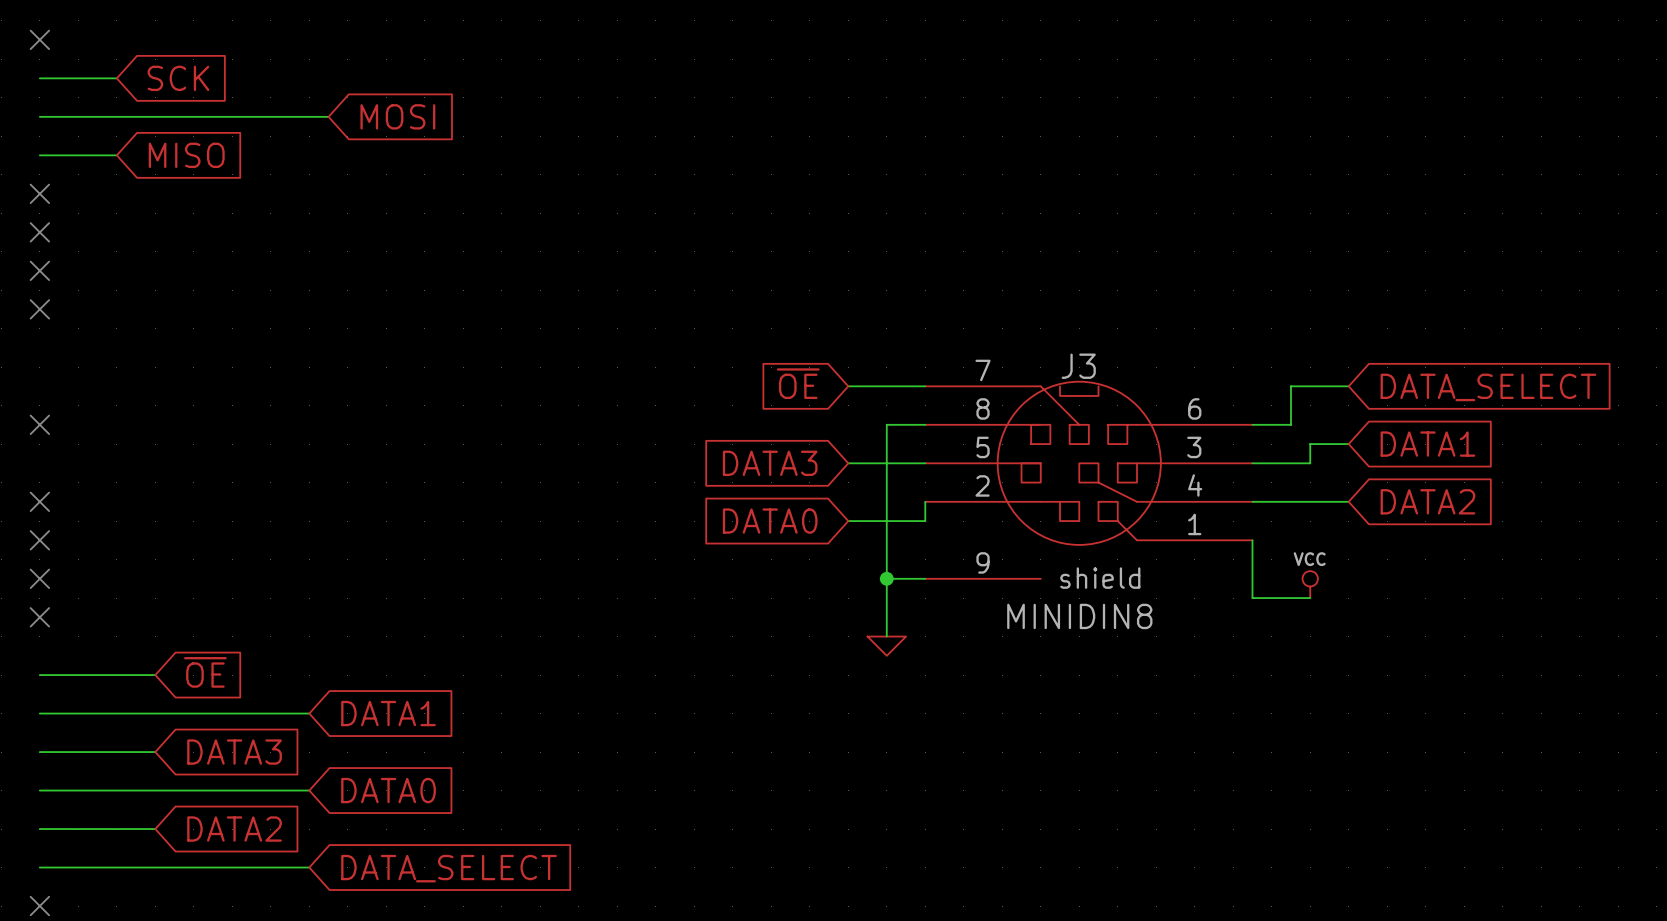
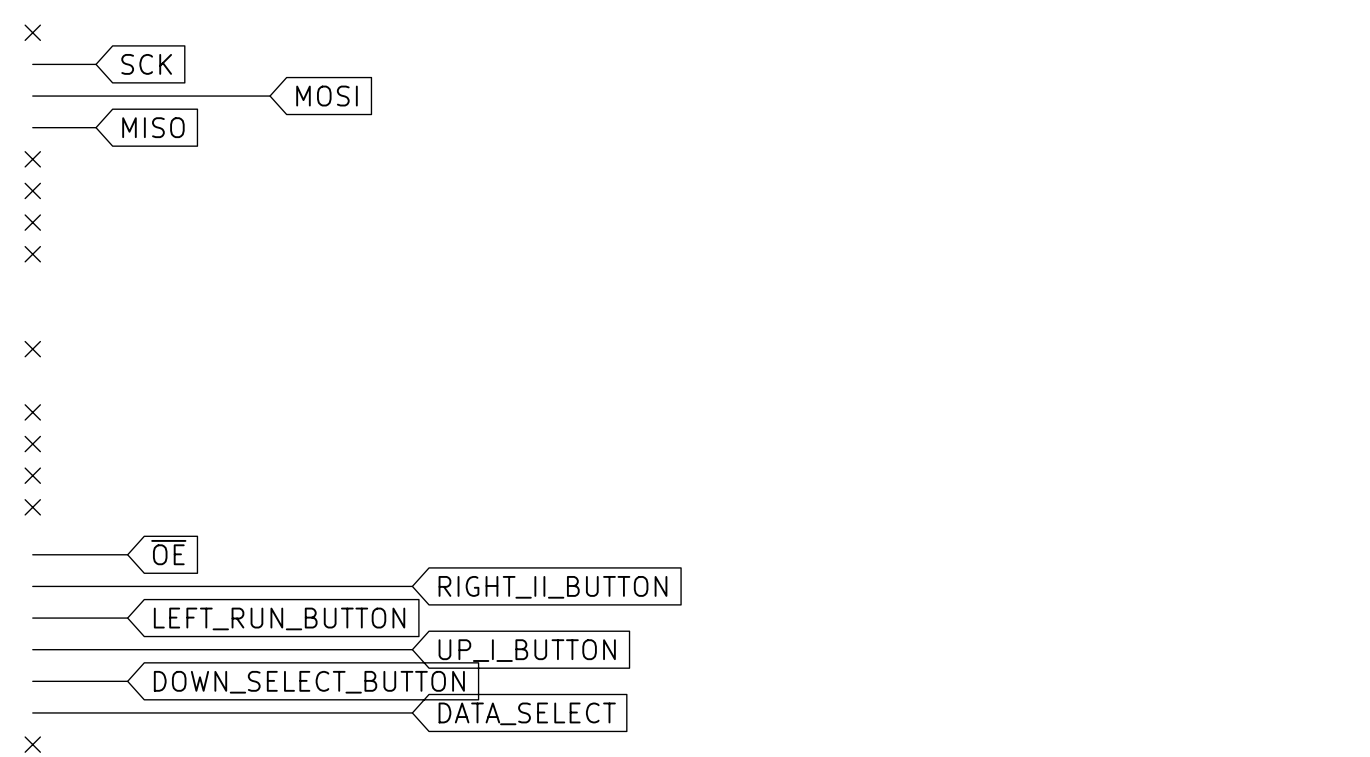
global label: ~{OE} (798, 383) -> none
wire: (848, 386) (925, 386) -> none
wire: (1348, 386) (1290, 386) (1290, 424) (1252, 424) -> none
global label: DATA_SELECT (1488, 387) -> none
wire: (925, 424) (886, 424) (886, 636) -> none
wire: (1348, 444) (1310, 444) (1310, 463) (1252, 463) -> none
global label: DATA1 (1427, 444) -> none
global label: DATA3 (770, 463) -> none
wire: (848, 463) (925, 463) -> none
J3: MINIDIN8 (1088, 480) -> none
wire: (925, 501) (925, 521) (848, 521) -> none
wire: (1252, 501) (1348, 501) -> none
global label: DATA2 (1427, 501) -> none
global label: DATA0 (770, 521) -> none
wire: (1252, 540) (1252, 598) (1310, 598) -> none
wire: (886, 578) (925, 578) -> none
junction: (886, 578) -> none
power symbol: VCC (1310, 584) -> none
power symbol: (886, 646) -> none
wire: none -> (254, 586) (412, 586)
global label: DATA1 (388, 713) -> none
global label: none -> RIGHT_II_BUTTON (552, 587)
global label: DATA3 (234, 752) -> LEFT_RUN_BUTTON (279, 618)
wire: none -> (254, 649) (412, 649)
global label: DATA0 (388, 790) -> none
global label: none -> UP_I_BUTTON (527, 650)
global label: DATA2 (234, 829) -> DOWN_SELECT_BUTTON (309, 682)
wire: none -> (254, 712) (412, 712)
global label position: DATA_SELECT (449, 868) -> DATA_SELECT (527, 713)

